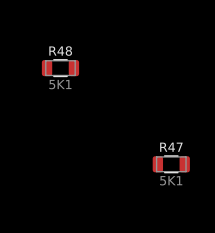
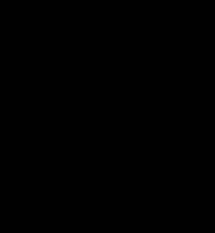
R48: 5K1 (60, 68) -> none
R47: 5K1 (171, 164) -> none

